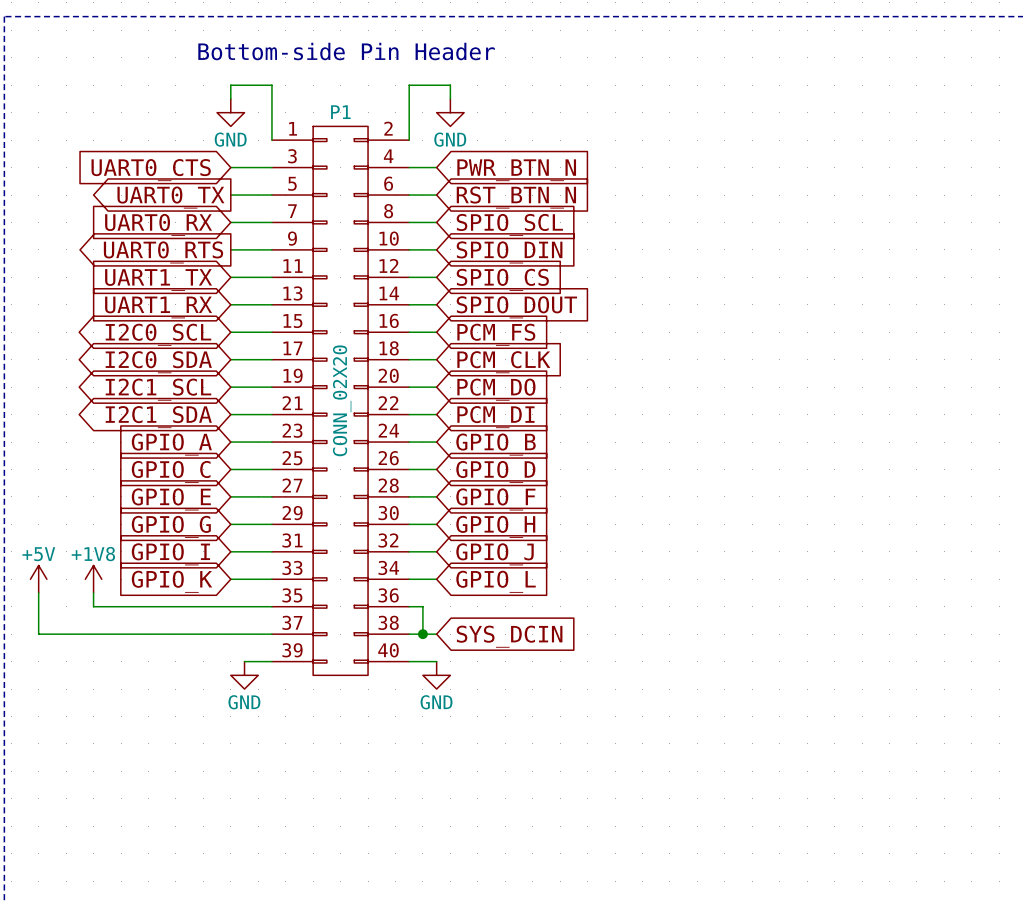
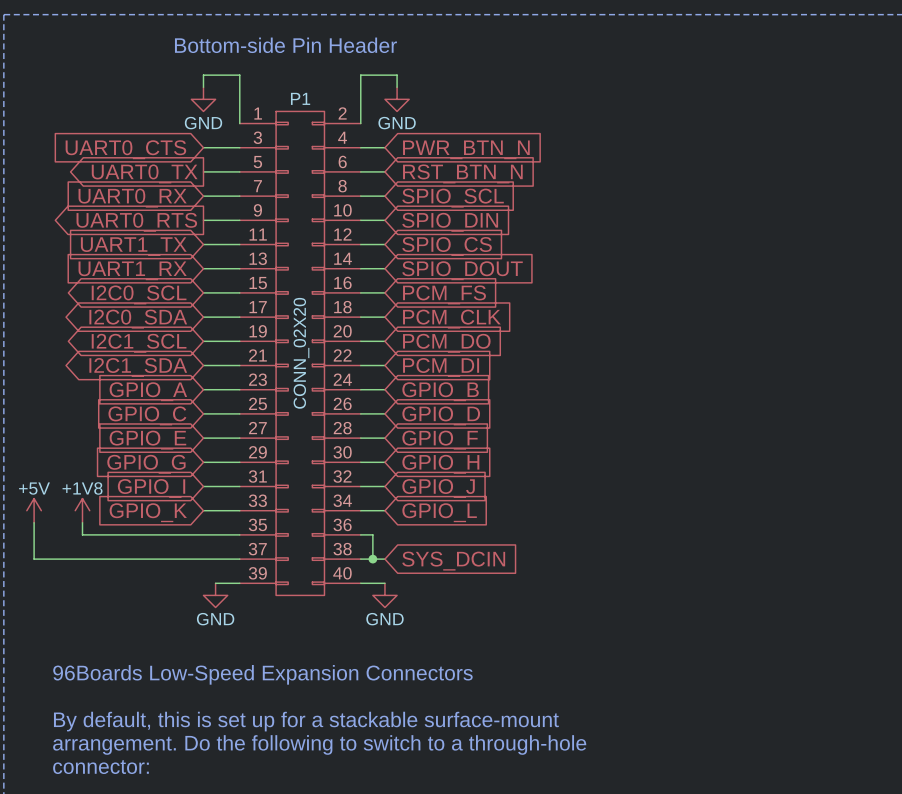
text: none -> 96Boards Low-Speed Expansion Connectors (262, 674)
text: none -> By default, this is set up for a stackable surface-mount (306, 721)
text: none -> arrangement. Do the following to switch to a through-hole (319, 744)
text: none -> connector: (101, 767)

